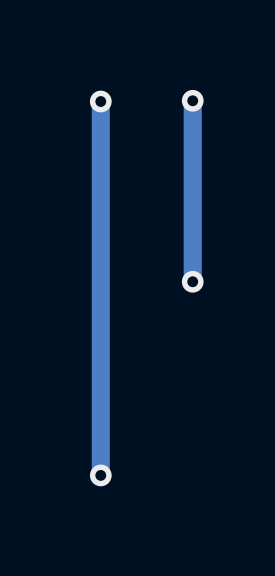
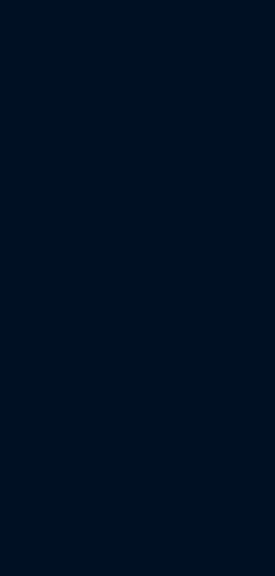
track: (192, 100) (192, 281) -> none
via: (192, 100) -> none
track: (100, 101) (100, 475) -> none
via: (100, 101) -> none
via: (192, 281) -> none
via: (100, 475) -> none

